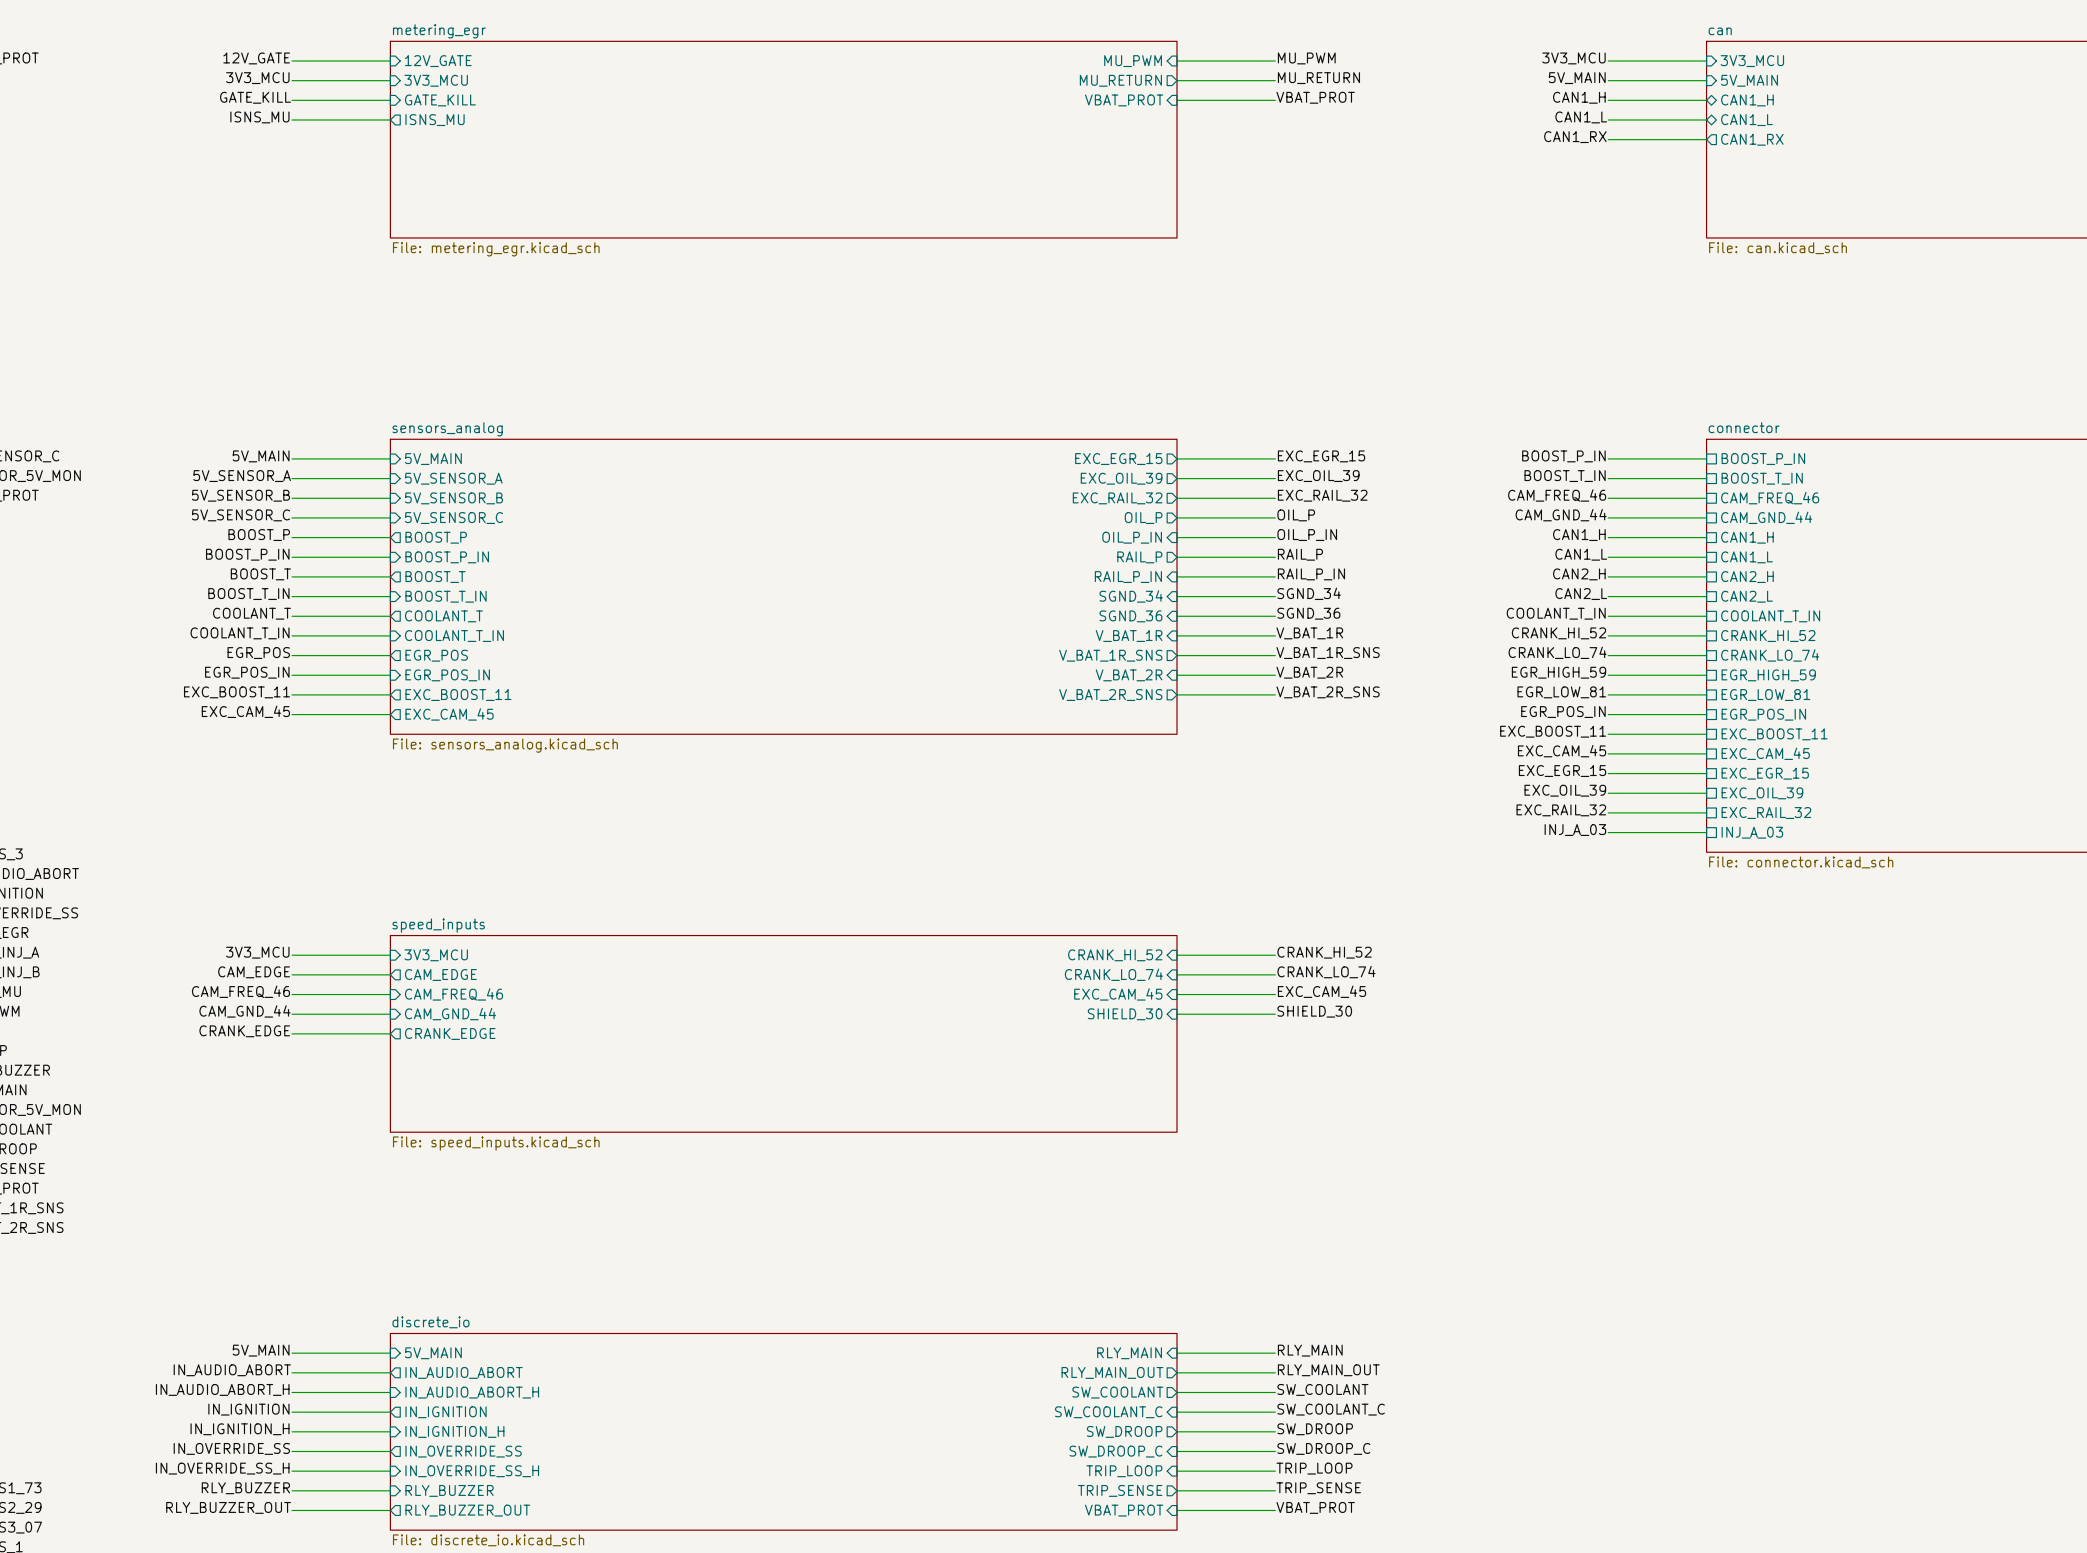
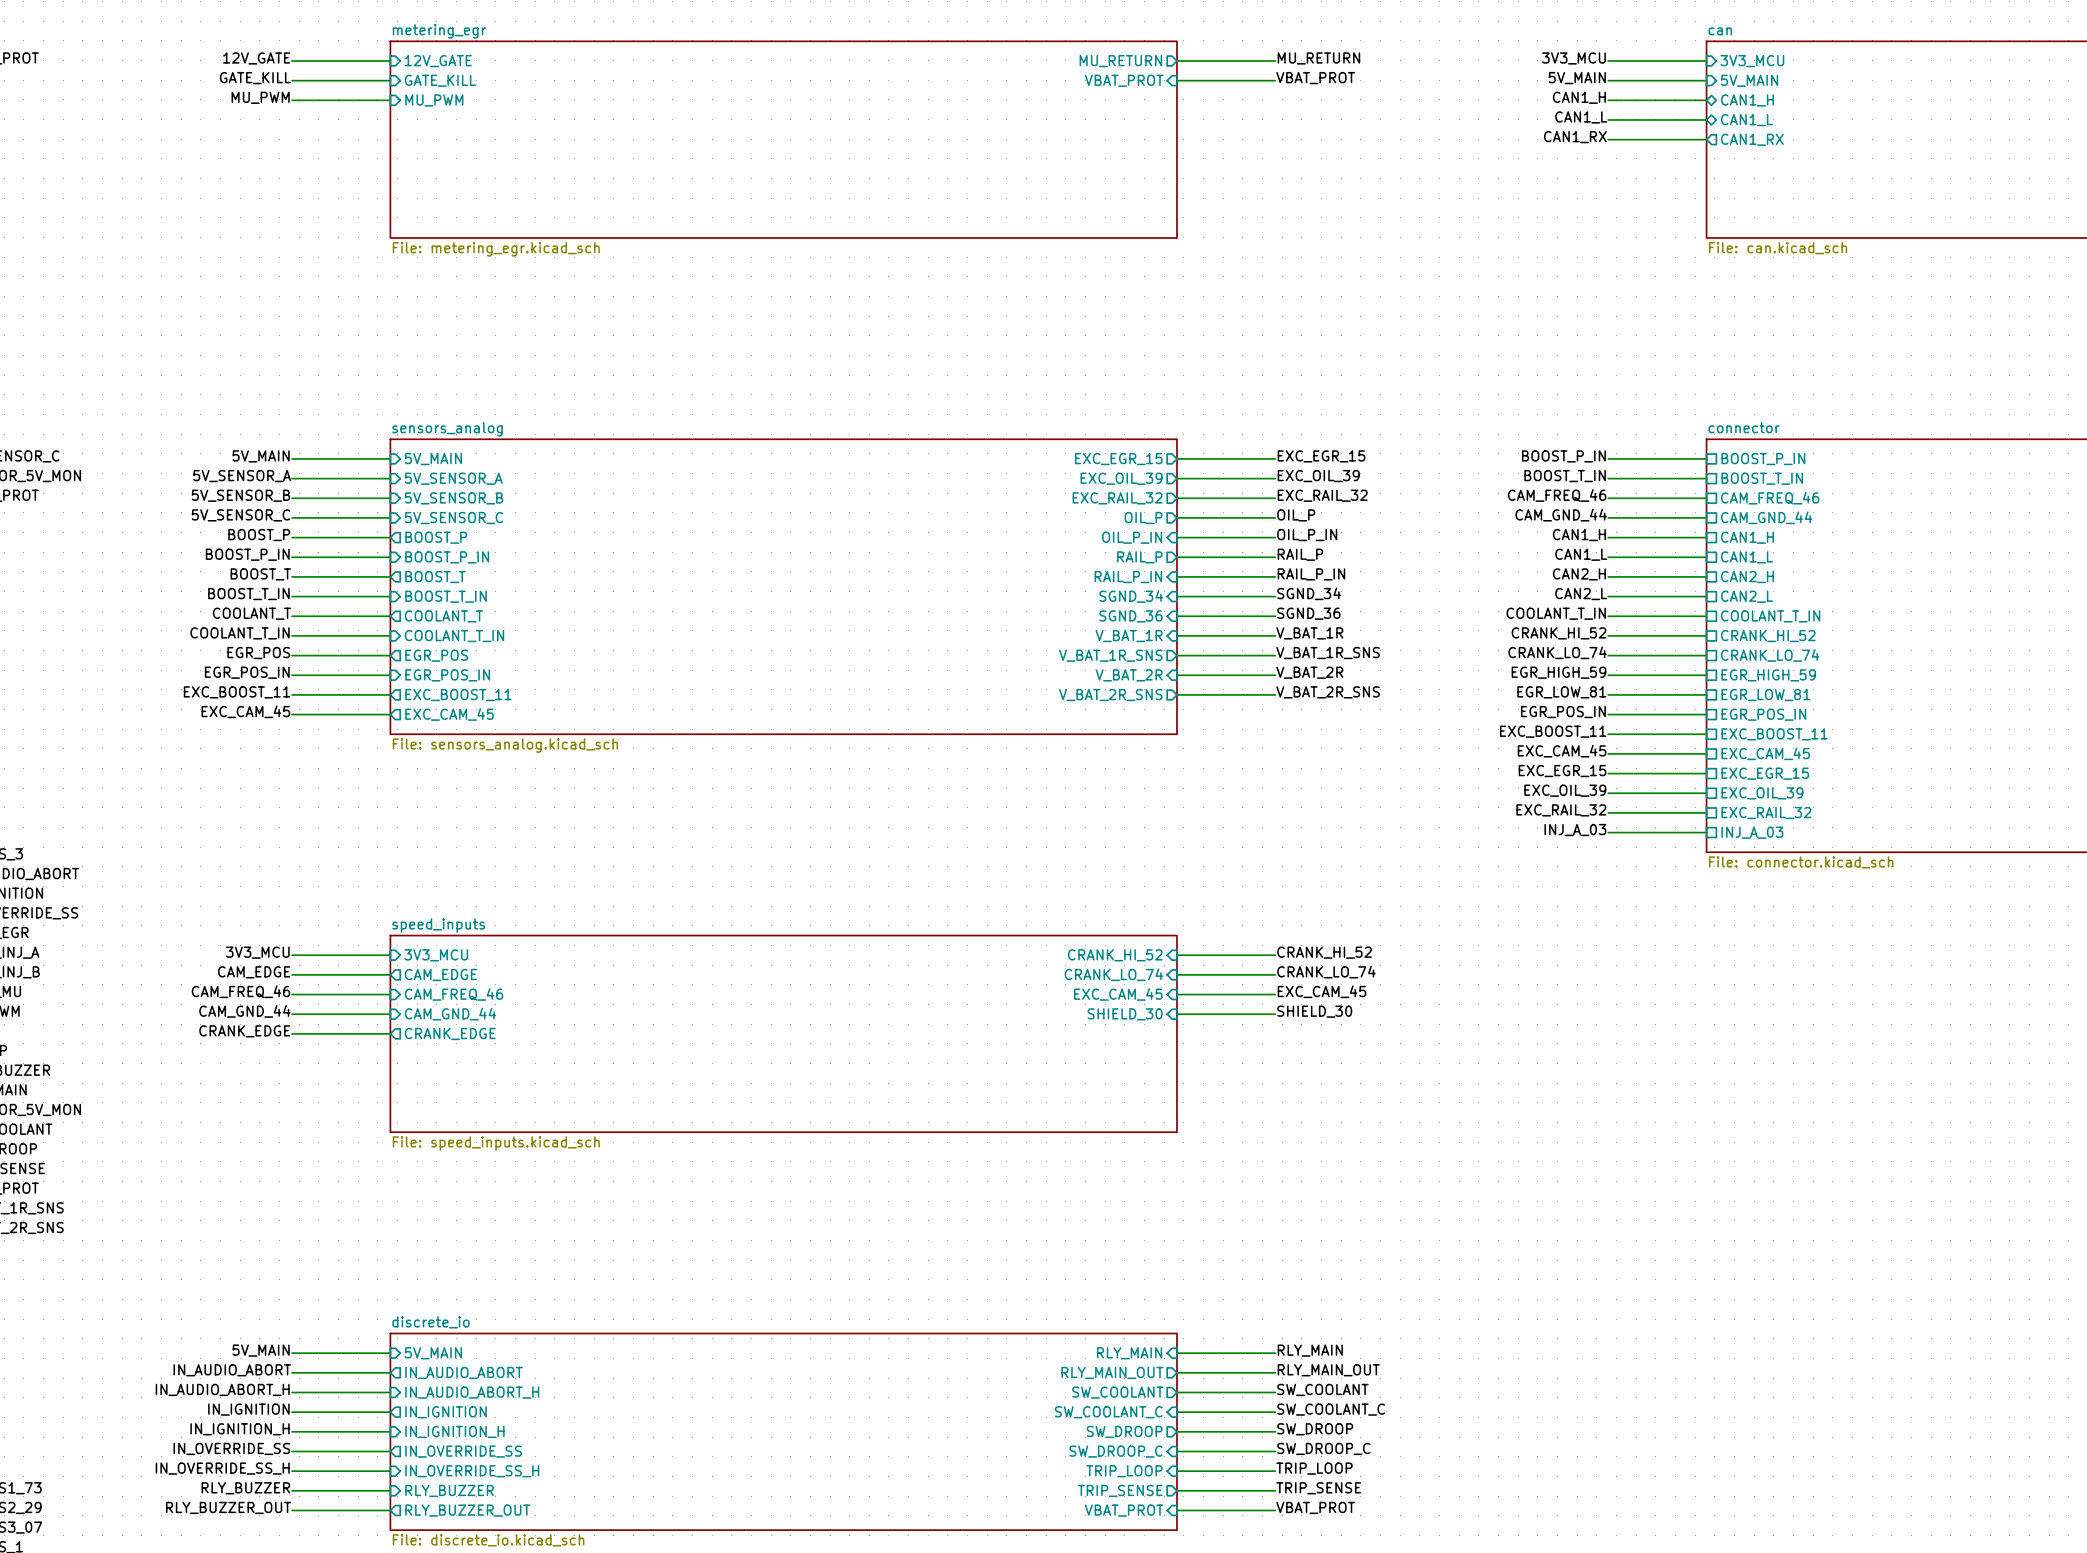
label: MU_PWM (1306, 58) -> MU_RETURN (1318, 58)
sheet pin shape: input (1133, 61) -> output (1120, 61)
sheet pin: MU_PWM (1133, 61) -> MU_RETURN (1120, 61)
label: 3V3_MCU (257, 78) -> GATE_KILL (255, 78)
label: MU_RETURN (1318, 78) -> VBAT_PROT (1315, 78)
sheet pin: 3V3_MCU (436, 80) -> GATE_KILL (440, 80)
sheet pin shape: output (1120, 80) -> input (1124, 80)
sheet pin: MU_RETURN (1120, 80) -> VBAT_PROT (1124, 80)
label: GATE_KILL (255, 97) -> MU_PWM (260, 97)
label: VBAT_PROT (1315, 97) -> none
sheet pin: GATE_KILL (440, 100) -> MU_PWM (434, 100)
sheet pin: VBAT_PROT (1124, 100) -> none
wire: (1177, 100) (1275, 100) -> none
label: ISNS_MU (259, 117) -> none
wire: (292, 119) (390, 119) -> none
sheet pin: ISNS_MU (435, 120) -> none

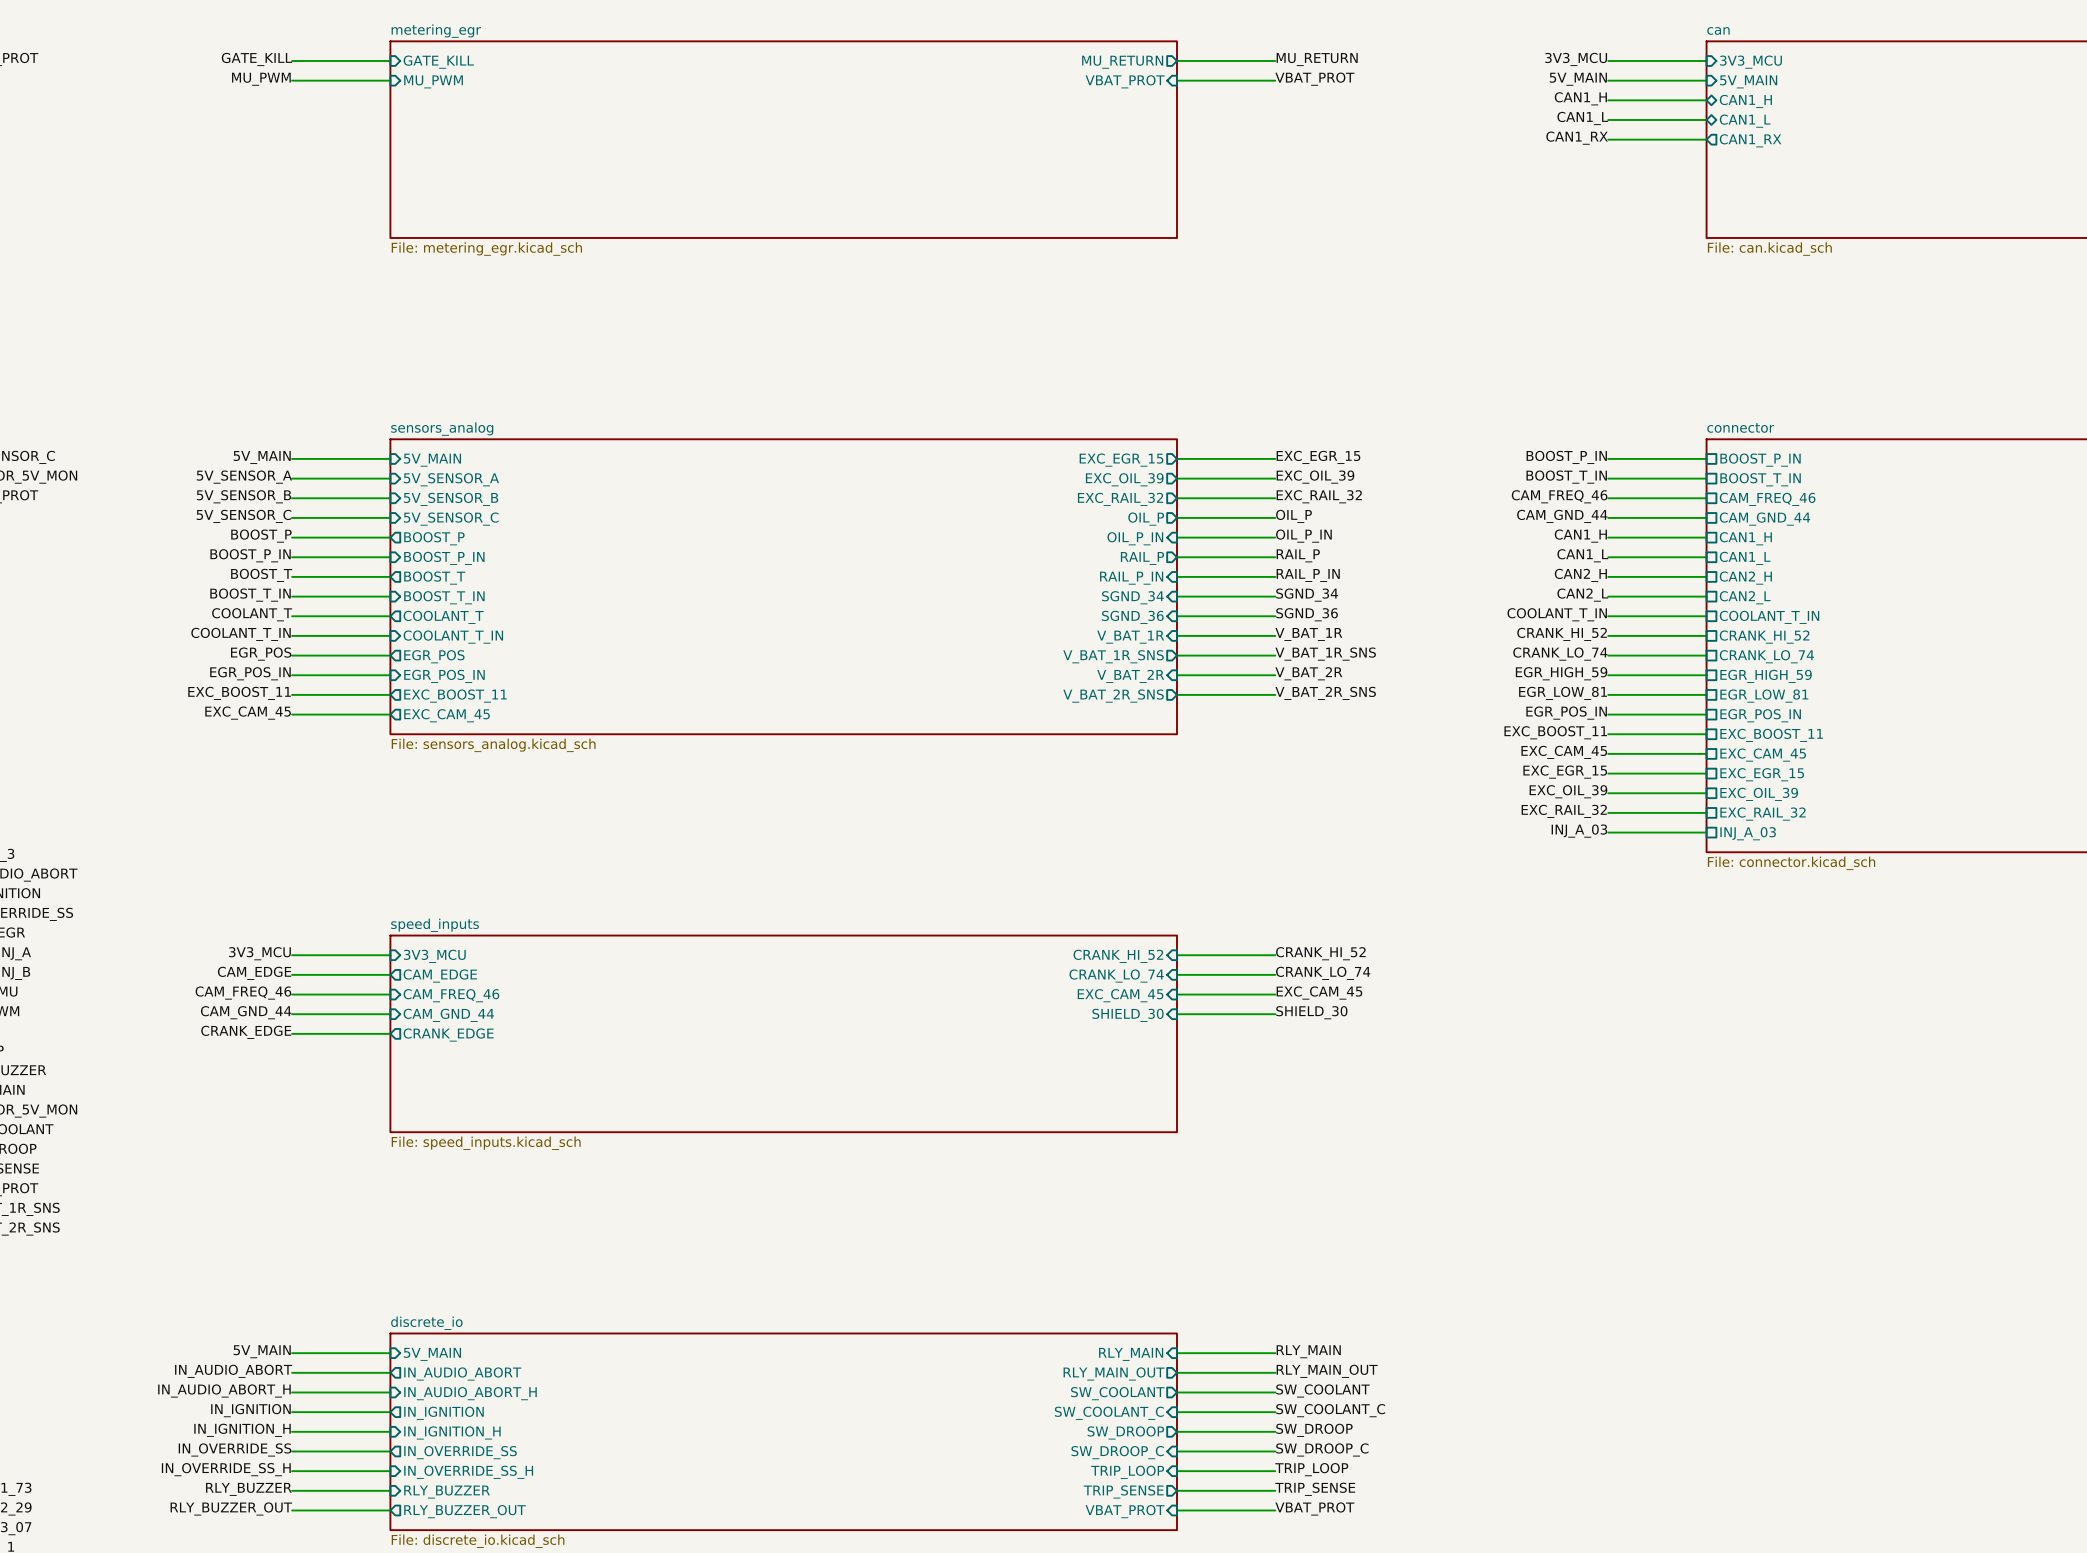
label: 12V_GATE (256, 58) -> GATE_KILL (256, 59)
sheet pin: 12V_GATE (438, 61) -> GATE_KILL (438, 62)
label: GATE_KILL (255, 78) -> MU_PWM (261, 79)
sheet pin: GATE_KILL (440, 80) -> MU_PWM (433, 81)
label: MU_PWM (260, 97) -> none
wire: (292, 100) (390, 100) -> none
sheet pin: MU_PWM (434, 100) -> none

